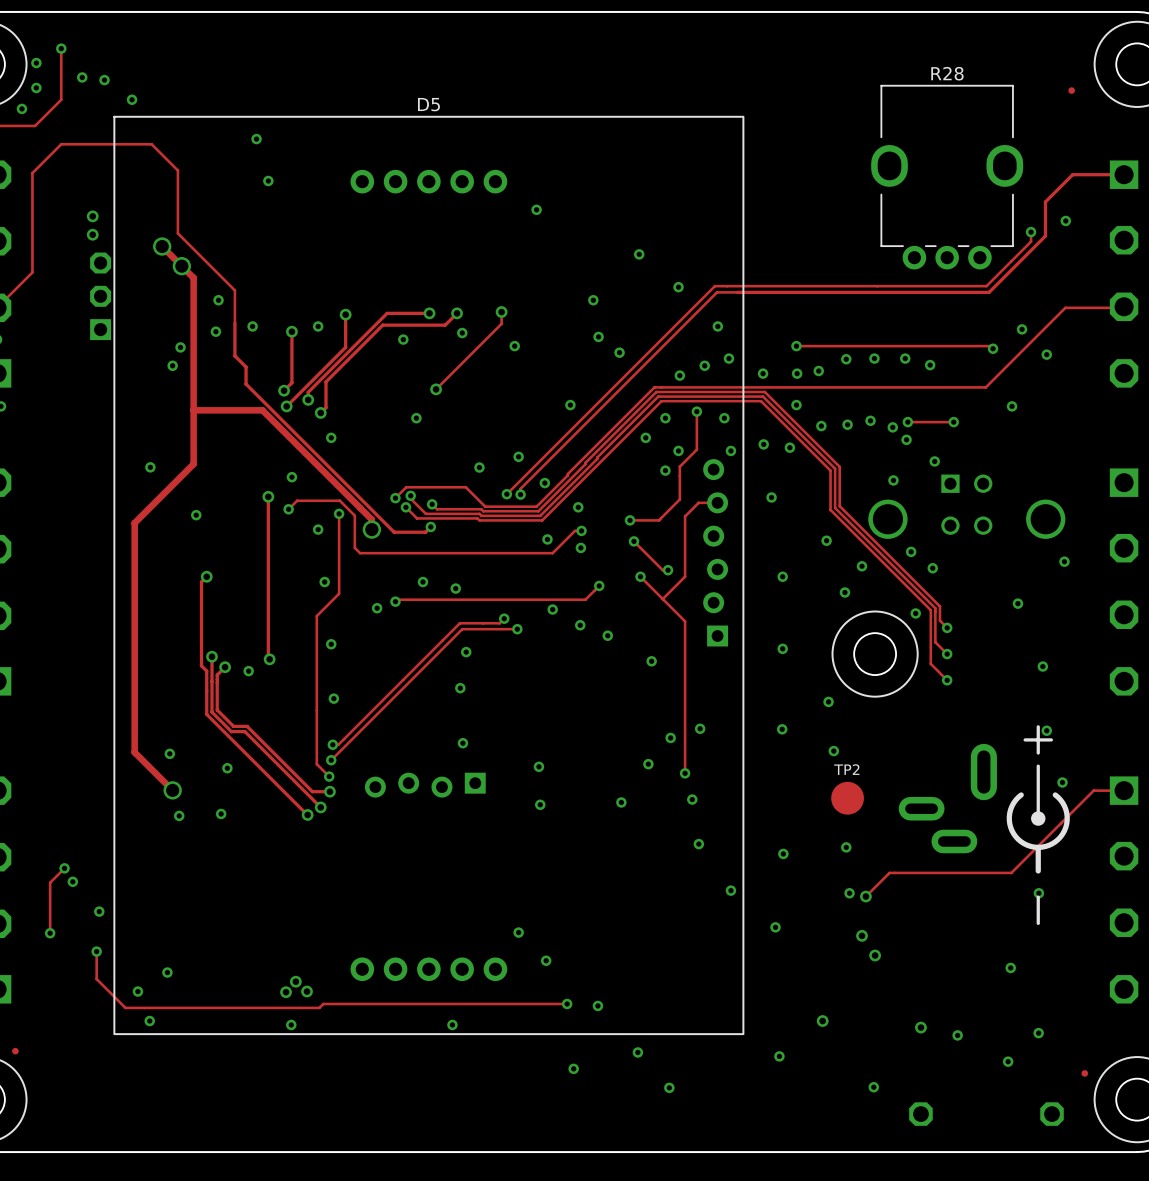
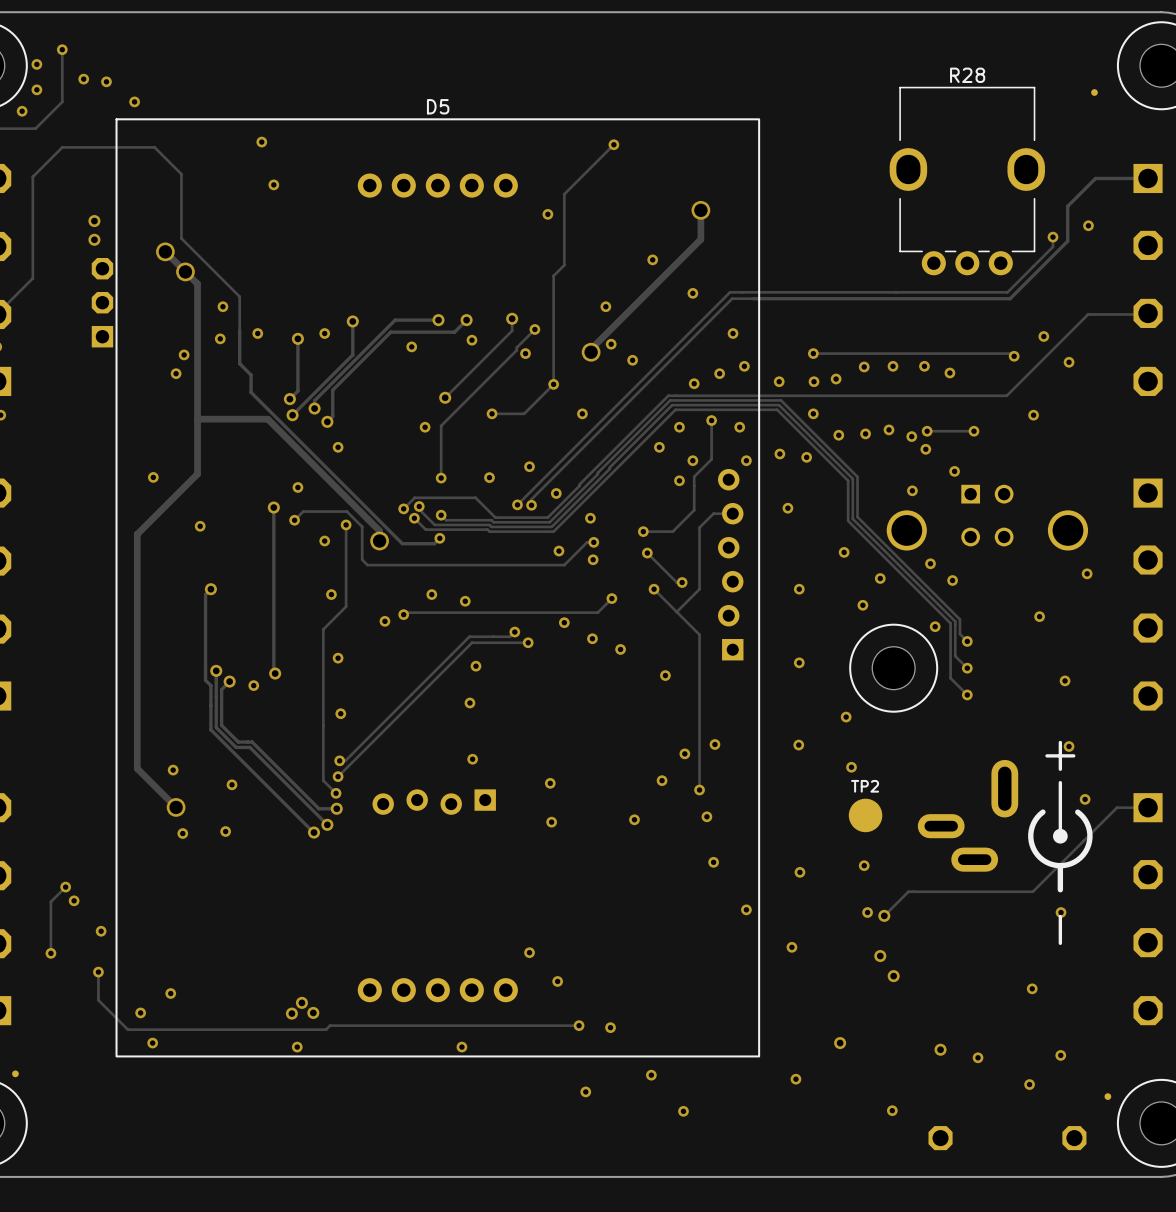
track: none -> (613, 144) (564, 194) (564, 265) (553, 275) (553, 384) (524, 413) (492, 413)
via: none -> (613, 144)
track: none -> (700, 210) (700, 239) (591, 349) (591, 352)
via: none -> (700, 210)
track: none -> (534, 329) (516, 347) (516, 350) (441, 425) (441, 478)
via: none -> (534, 329)
via: none -> (591, 352)
via: none -> (553, 384)
via: none -> (492, 413)
via: none -> (441, 478)

